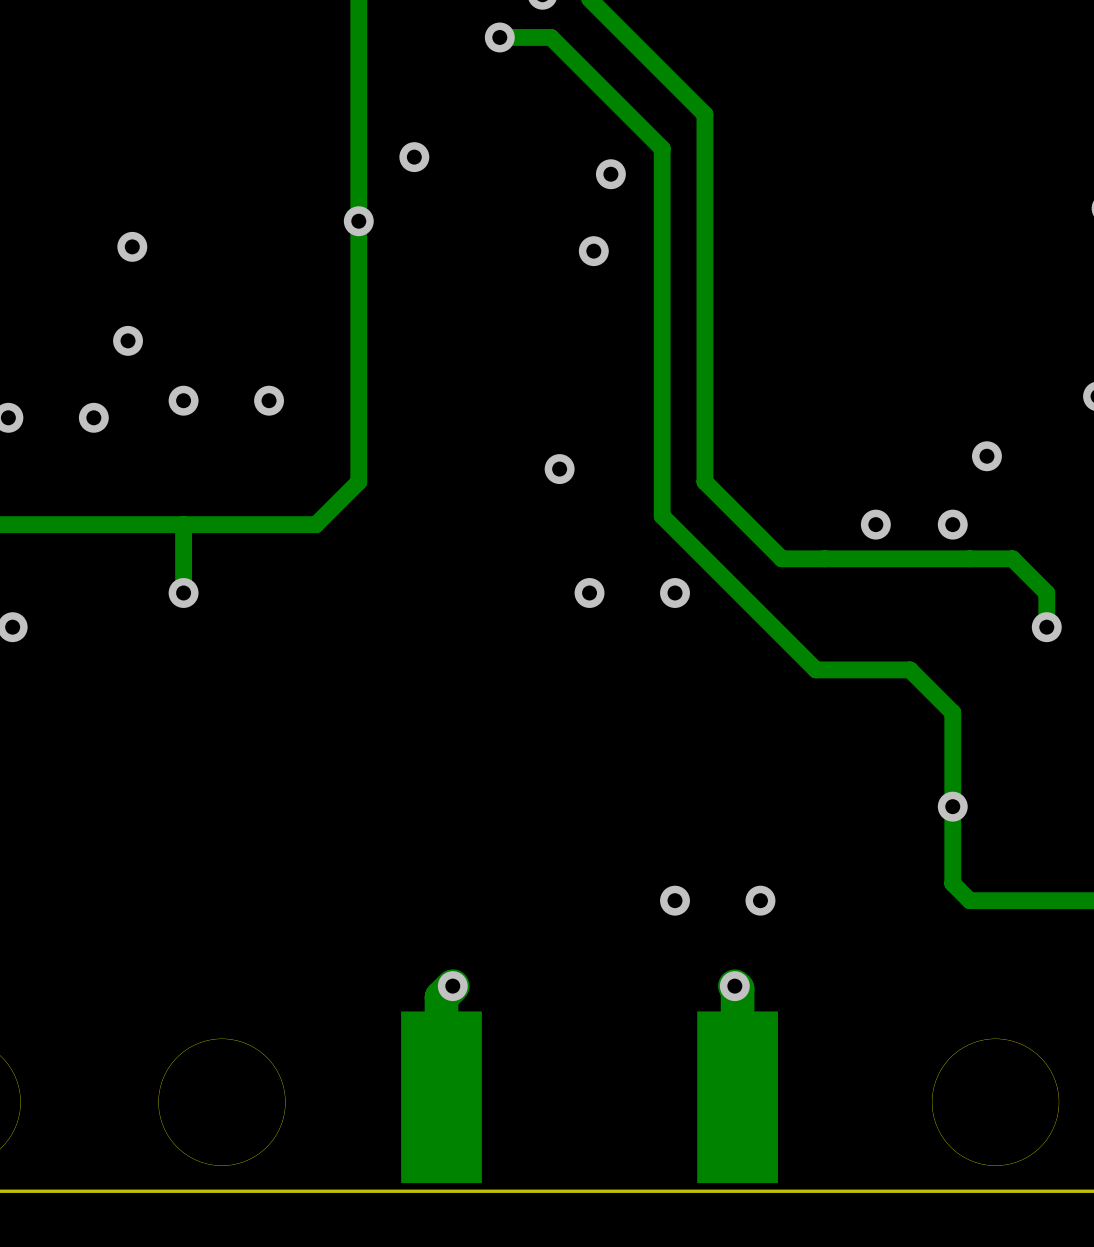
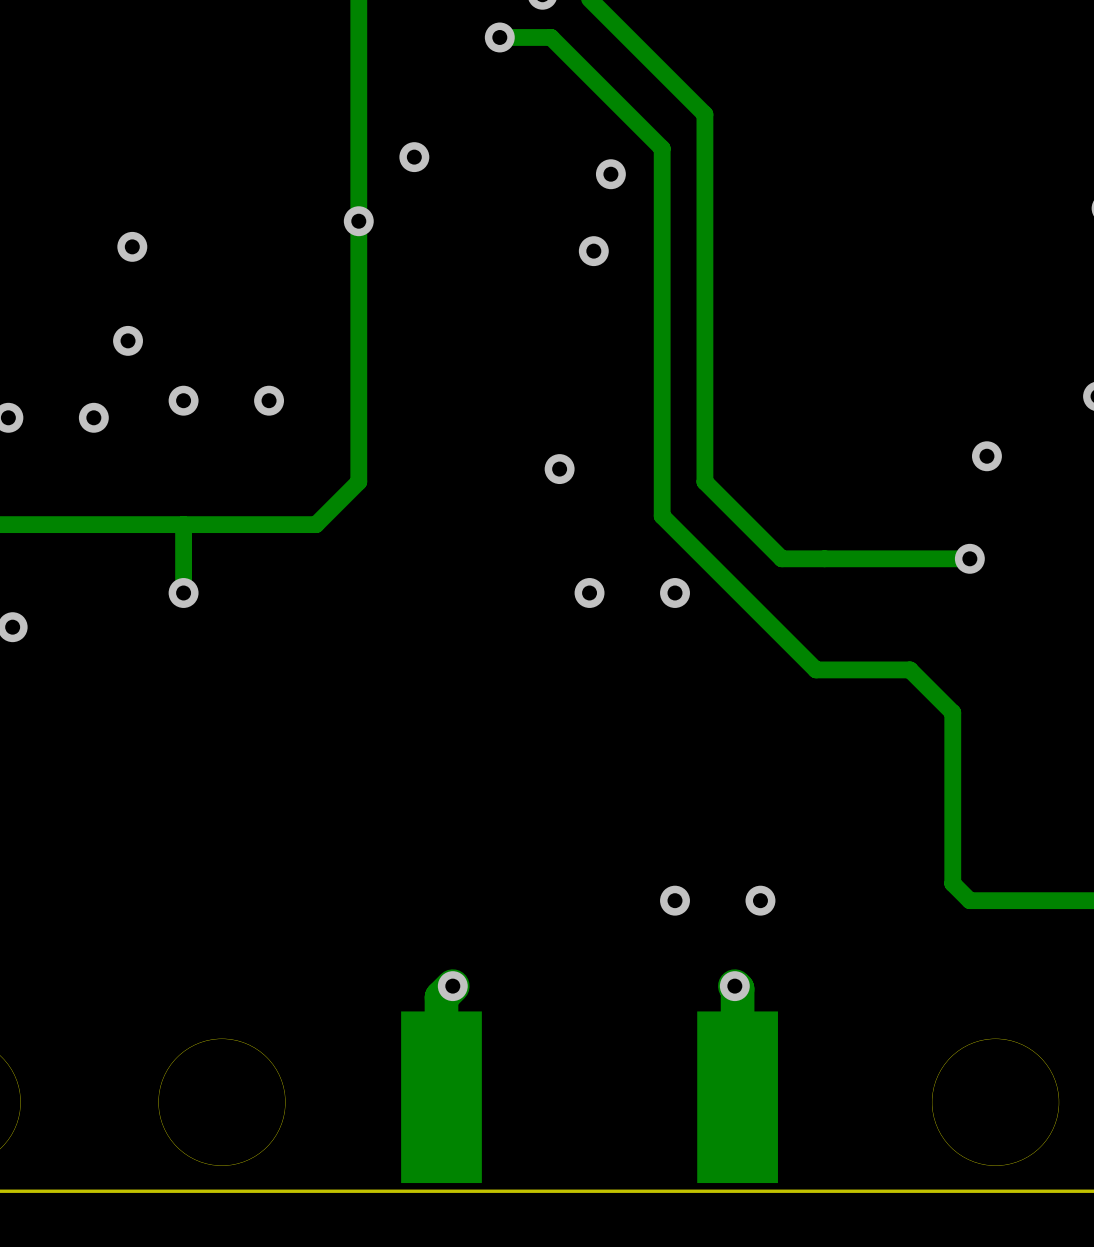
via: (875, 524) -> none
via position: (952, 524) -> (969, 558)
track: (969, 558) (1012, 558) (1046, 592) (1046, 627) -> none
via: (1046, 627) -> none
via: (952, 806) -> none

